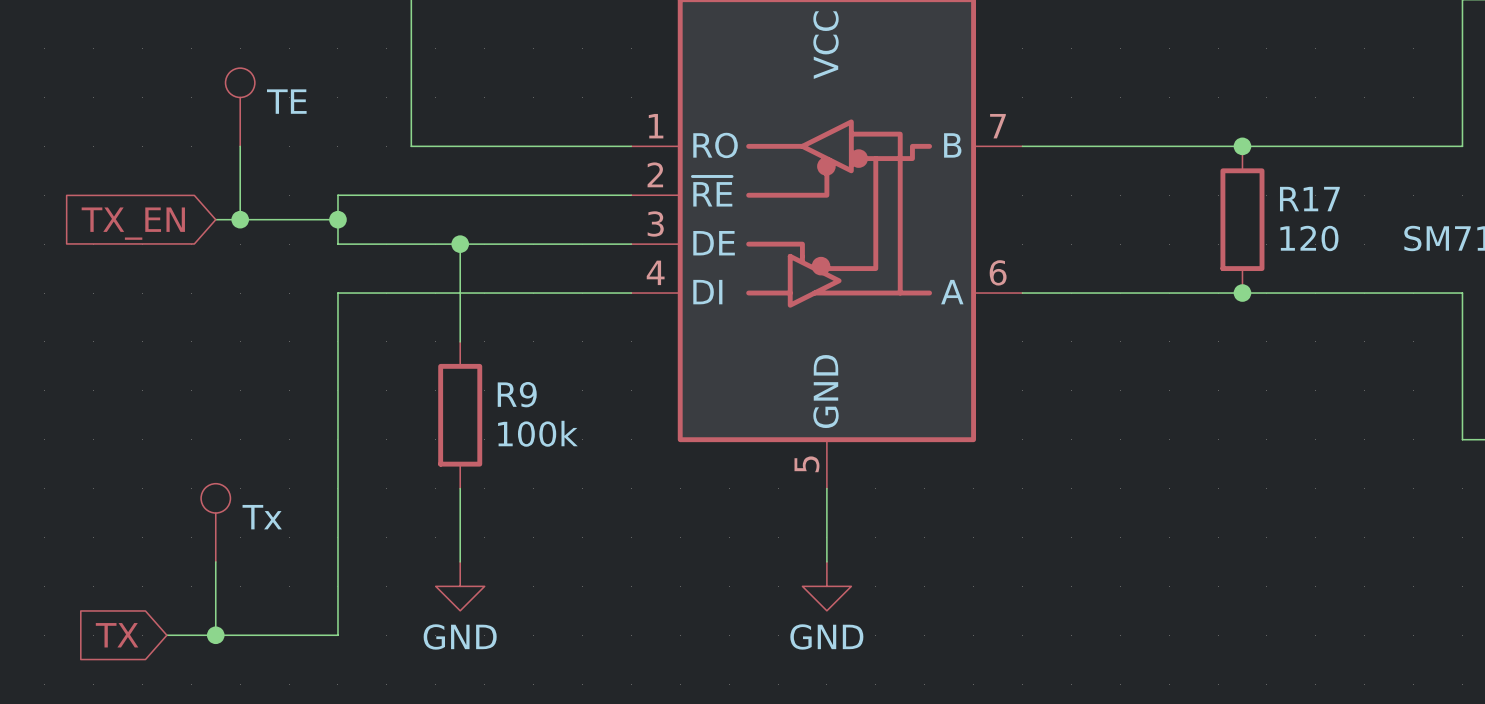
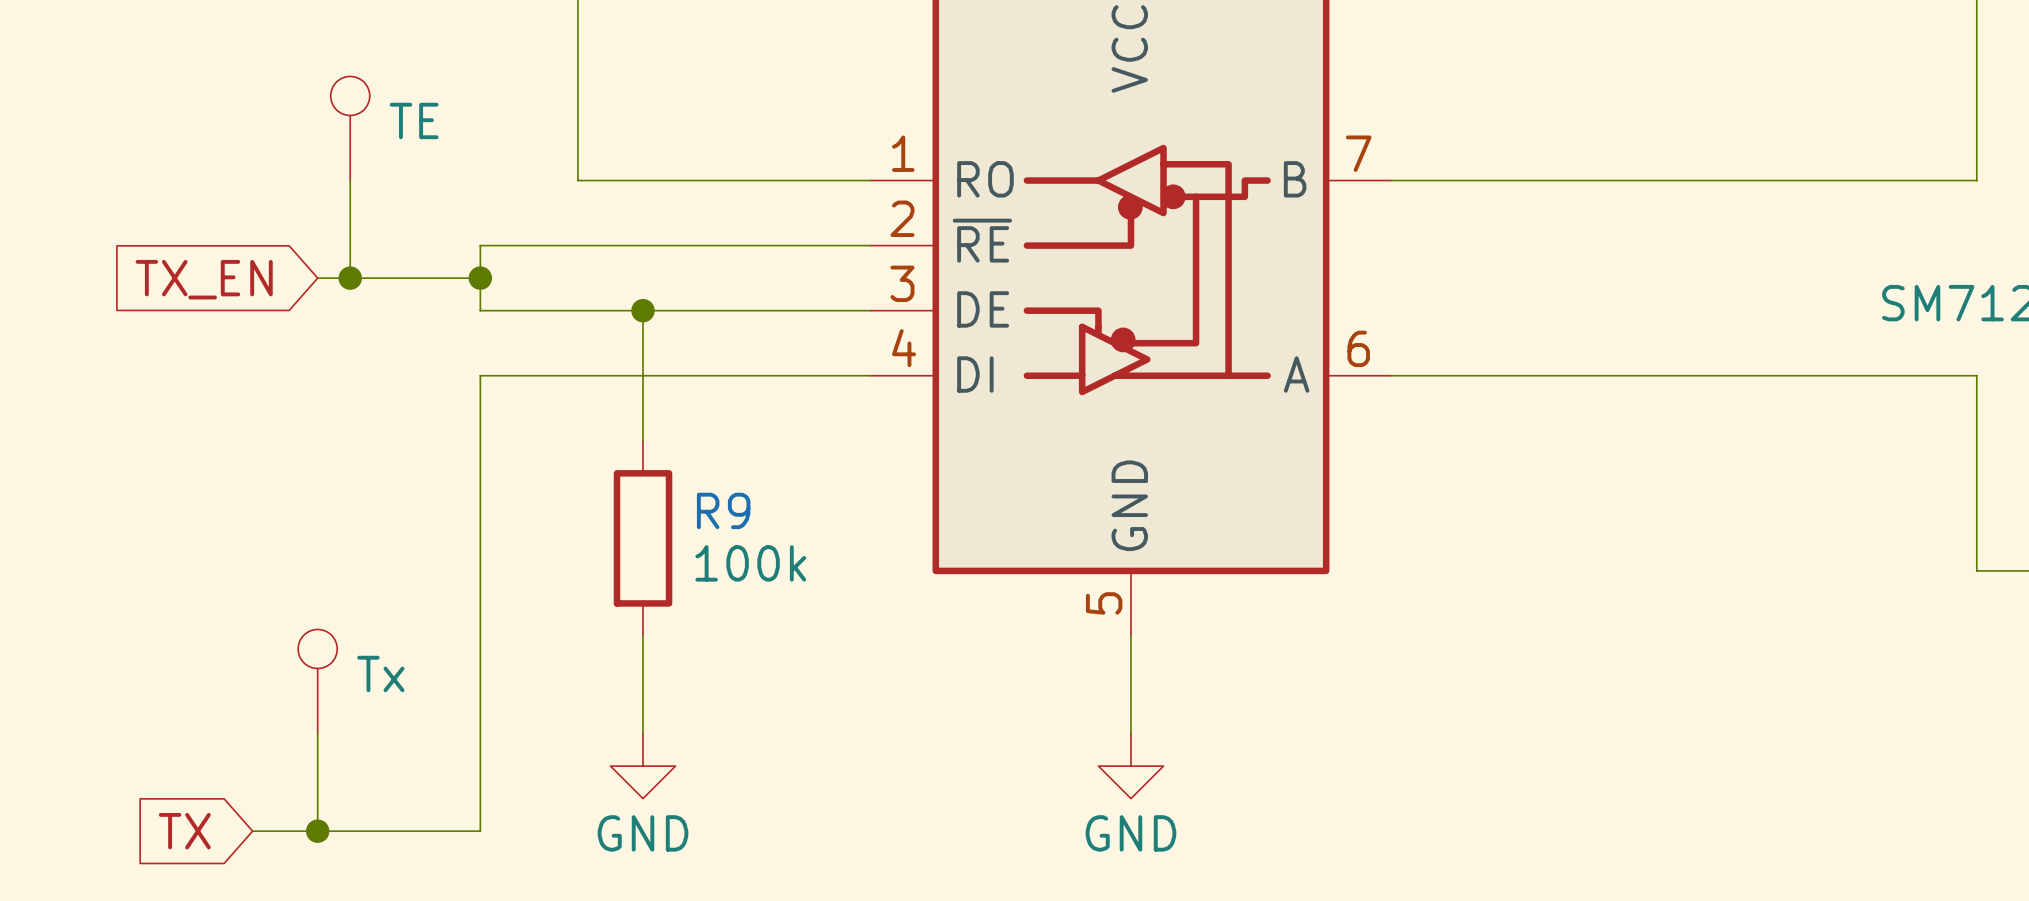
junction: (1242, 146) -> none
R17: 120 (1242, 219) -> none
junction: (1242, 293) -> none

